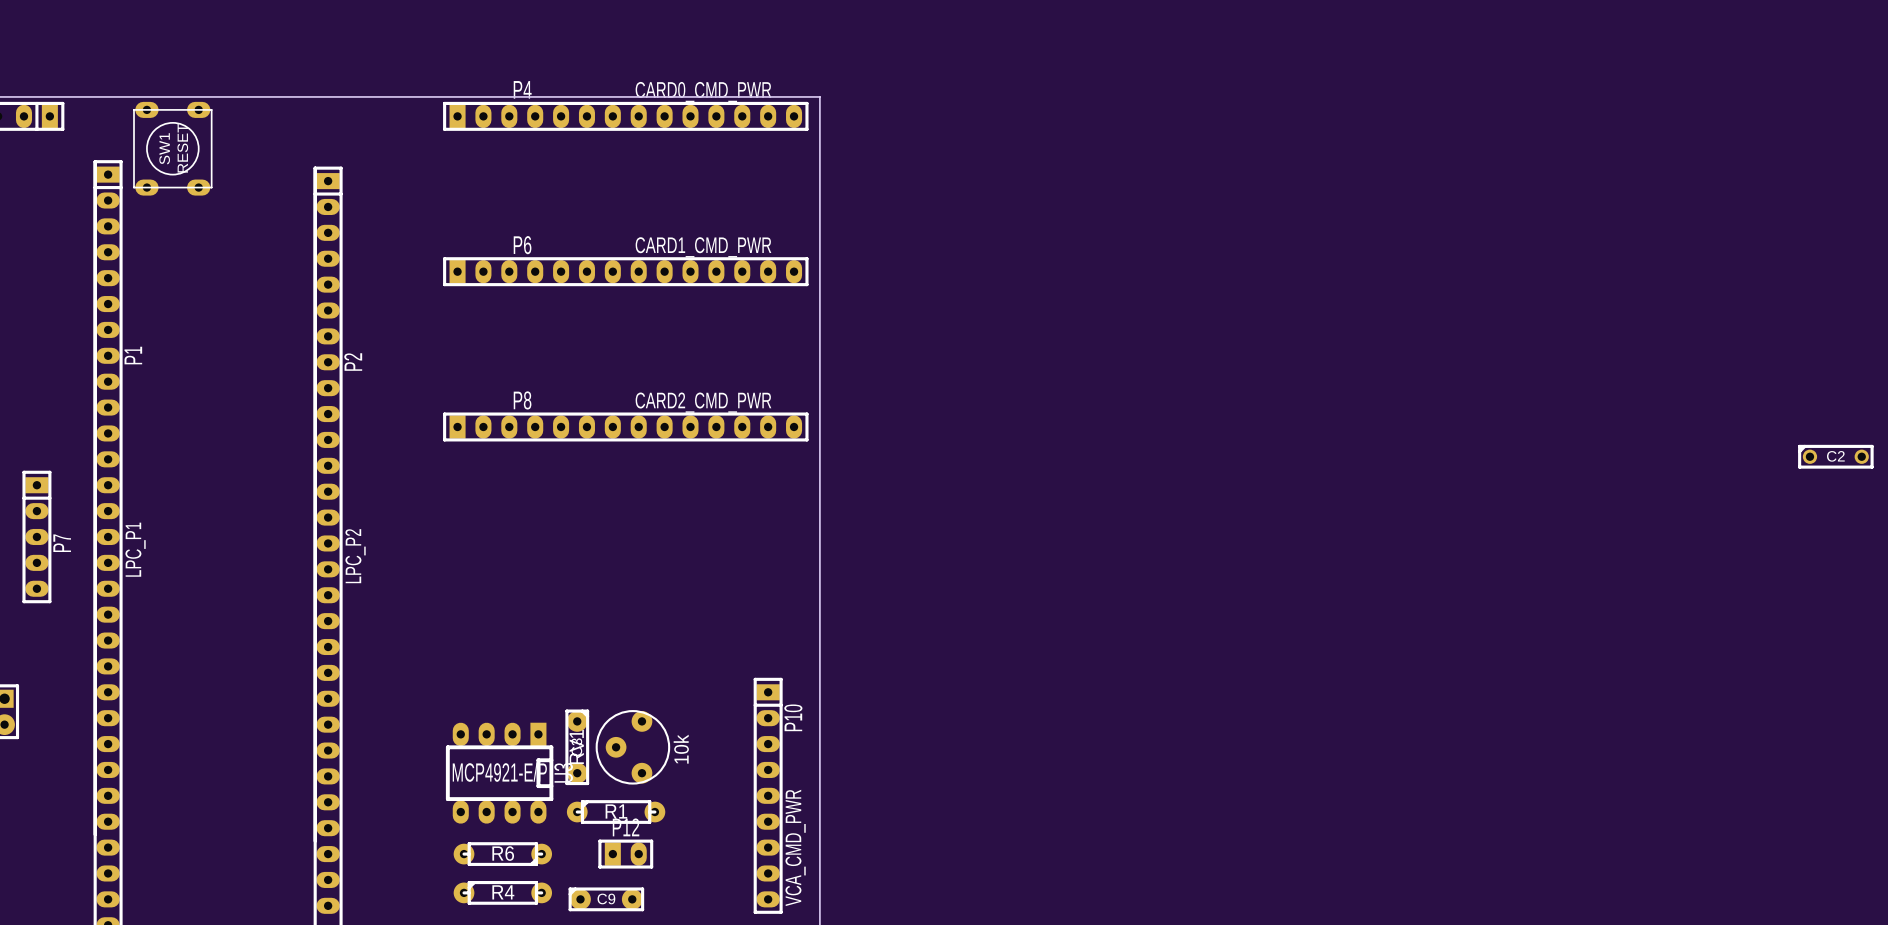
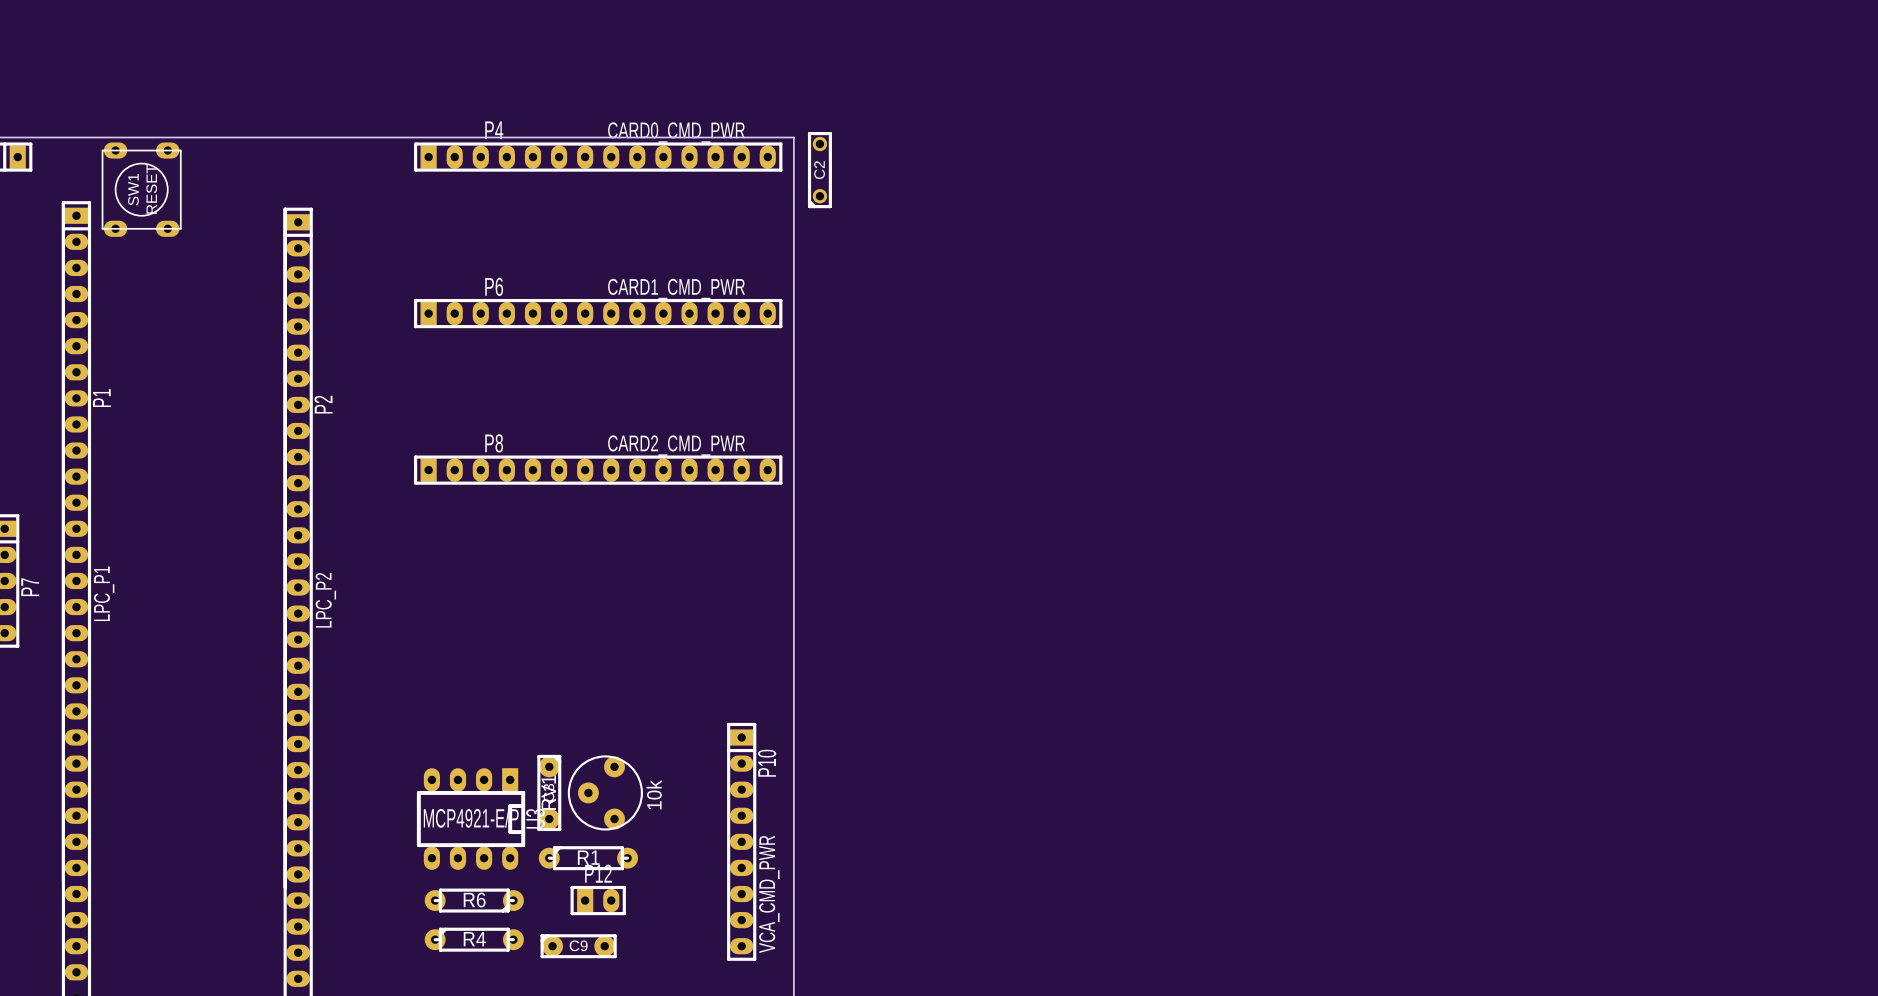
C2 rotation: 0° (1835, 456) -> 90° counterclockwise (819, 170)
C2 position: (1835, 456) -> (819, 170)

